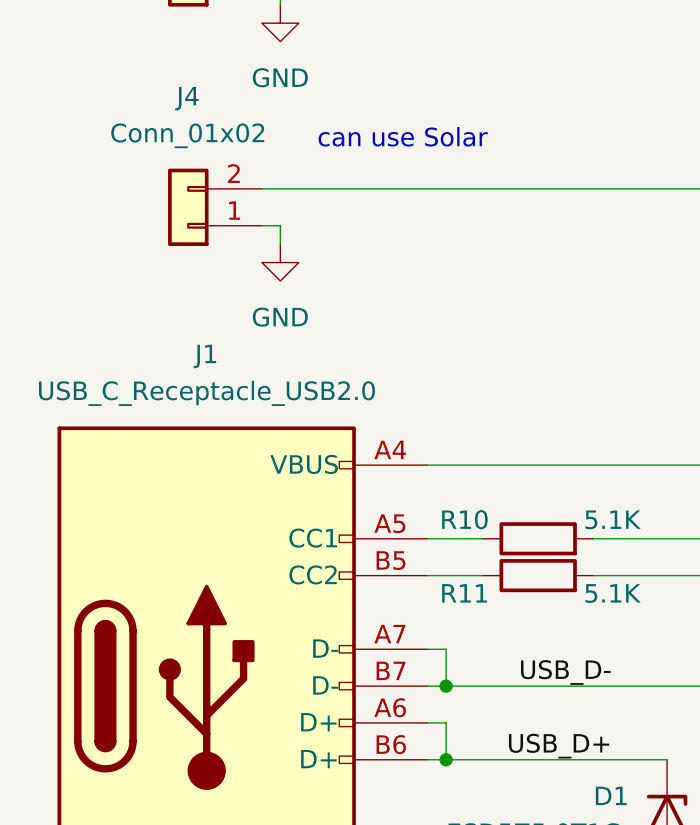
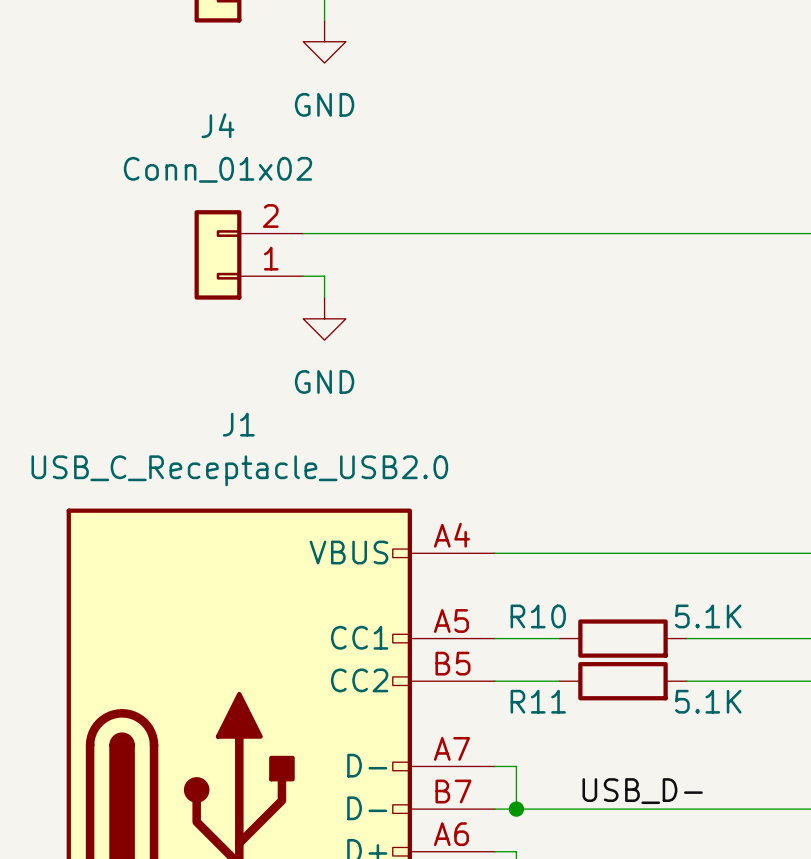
text: can use Solar (403, 136) -> none

